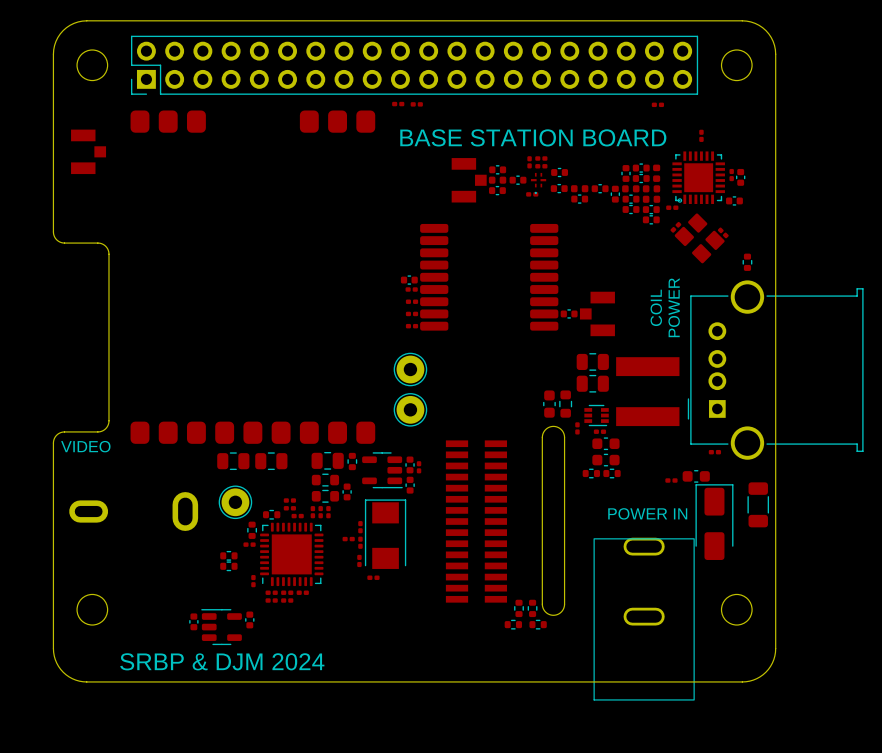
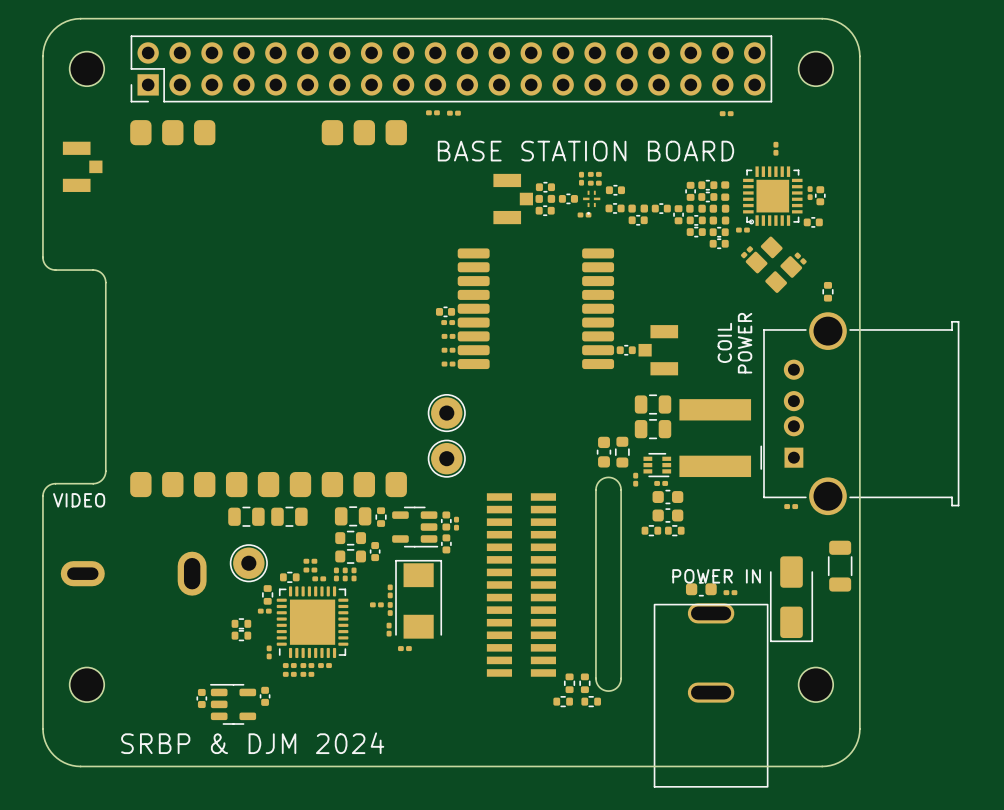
part position: (696, 476) -> (701, 589)
part position: (671, 480) -> (730, 592)
part rotation: 0° (714, 522) -> 180° (791, 599)

